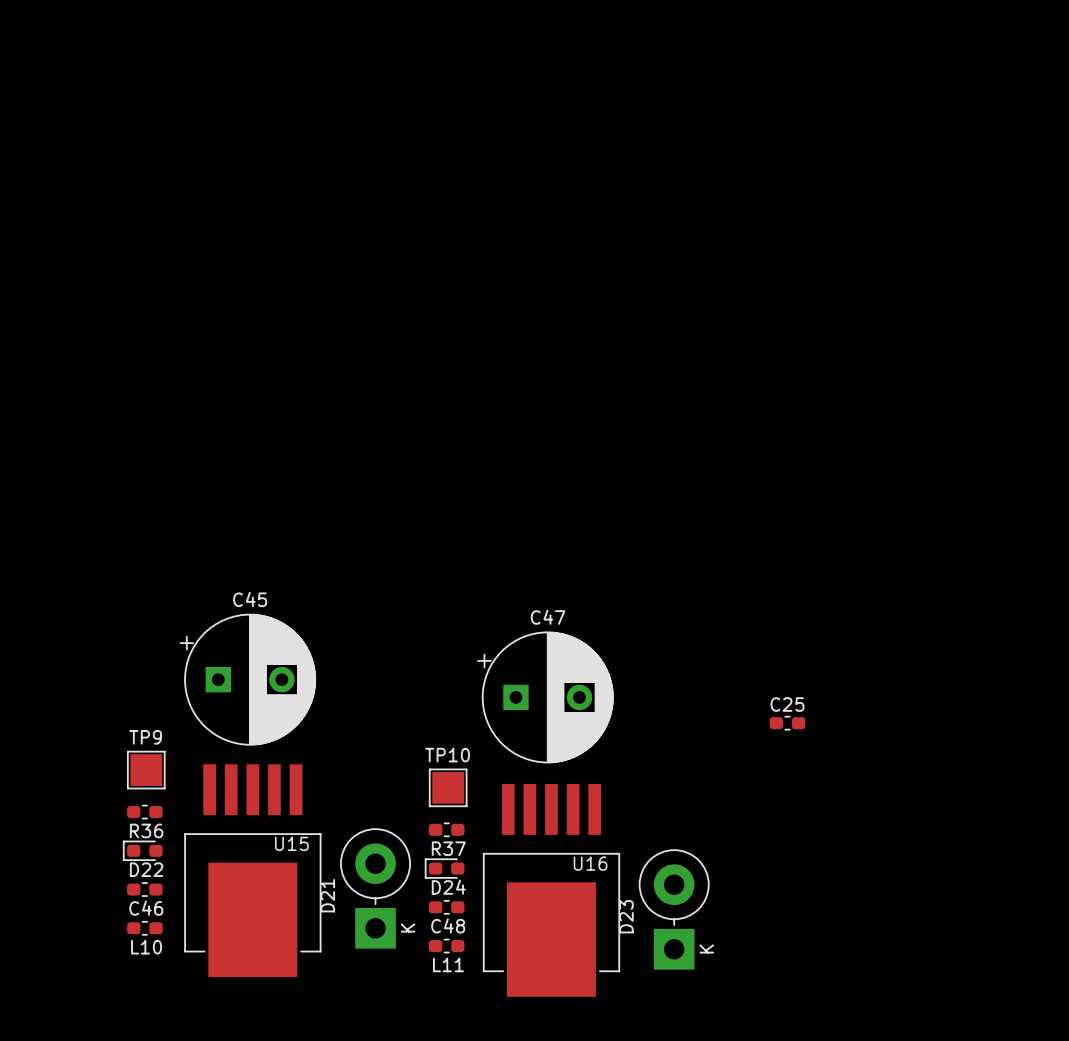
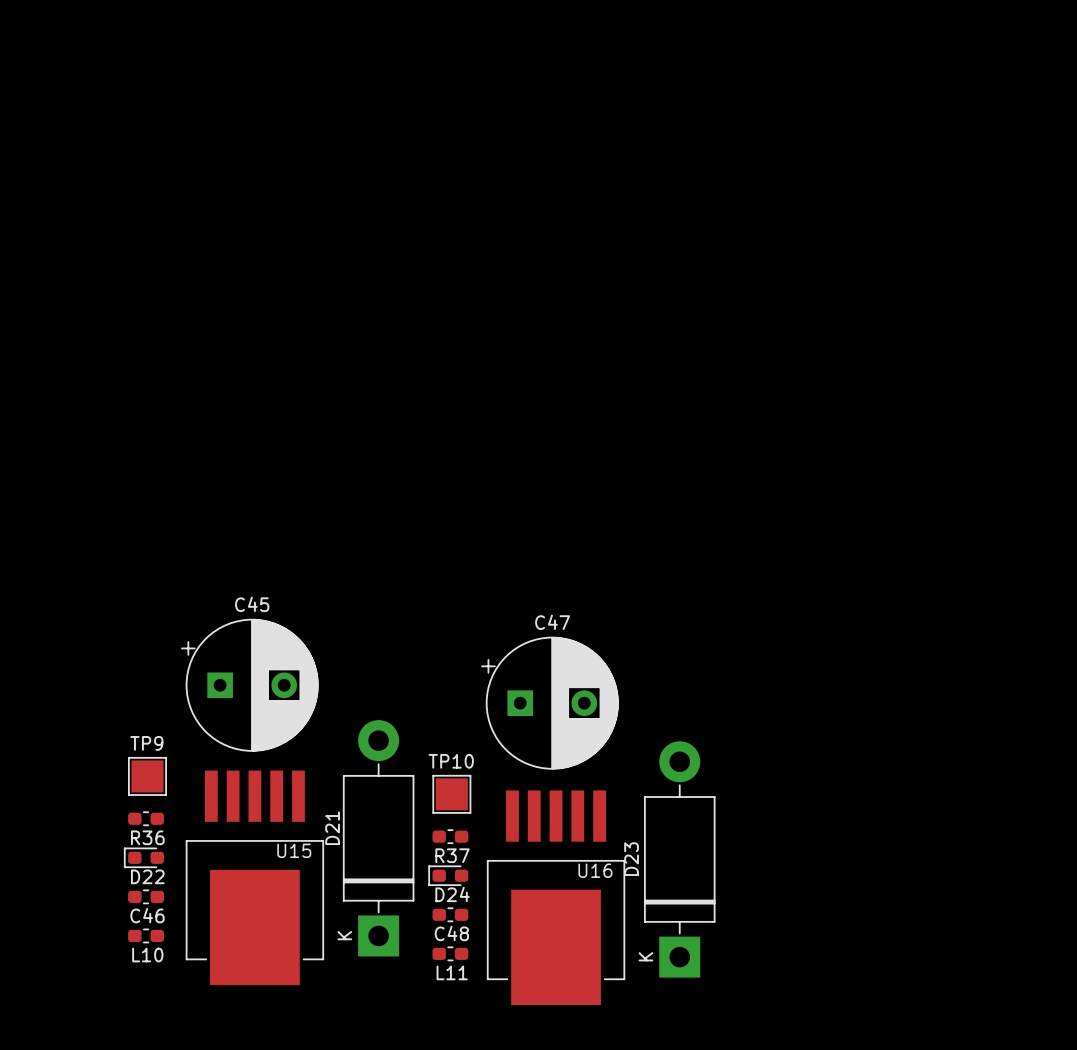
C25: (787, 723) -> none
D21 footprint: [340, 828, 411, 949] -> [342, 720, 415, 957]
D23 footprint: [638, 849, 710, 970] -> [644, 741, 716, 978]

